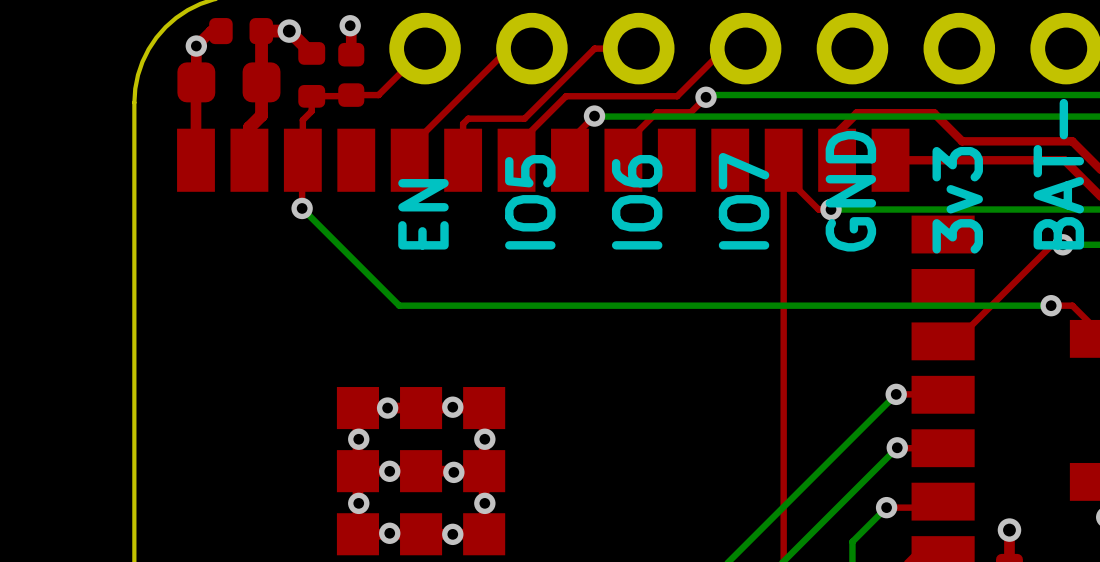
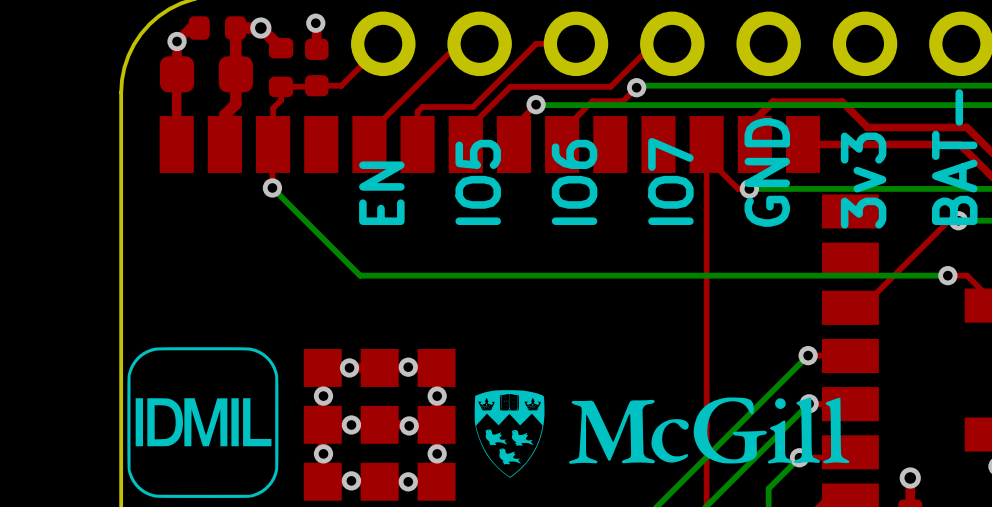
drawing: none -> [127, 347, 279, 498]
drawing: none -> [474, 390, 850, 478]

